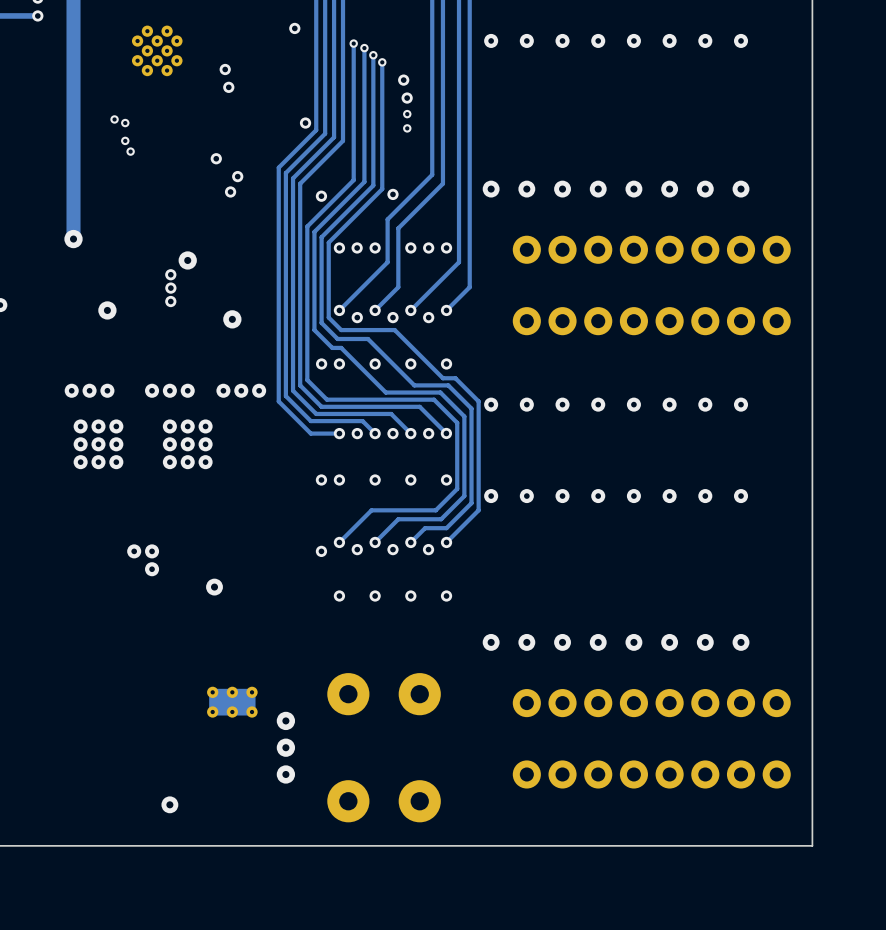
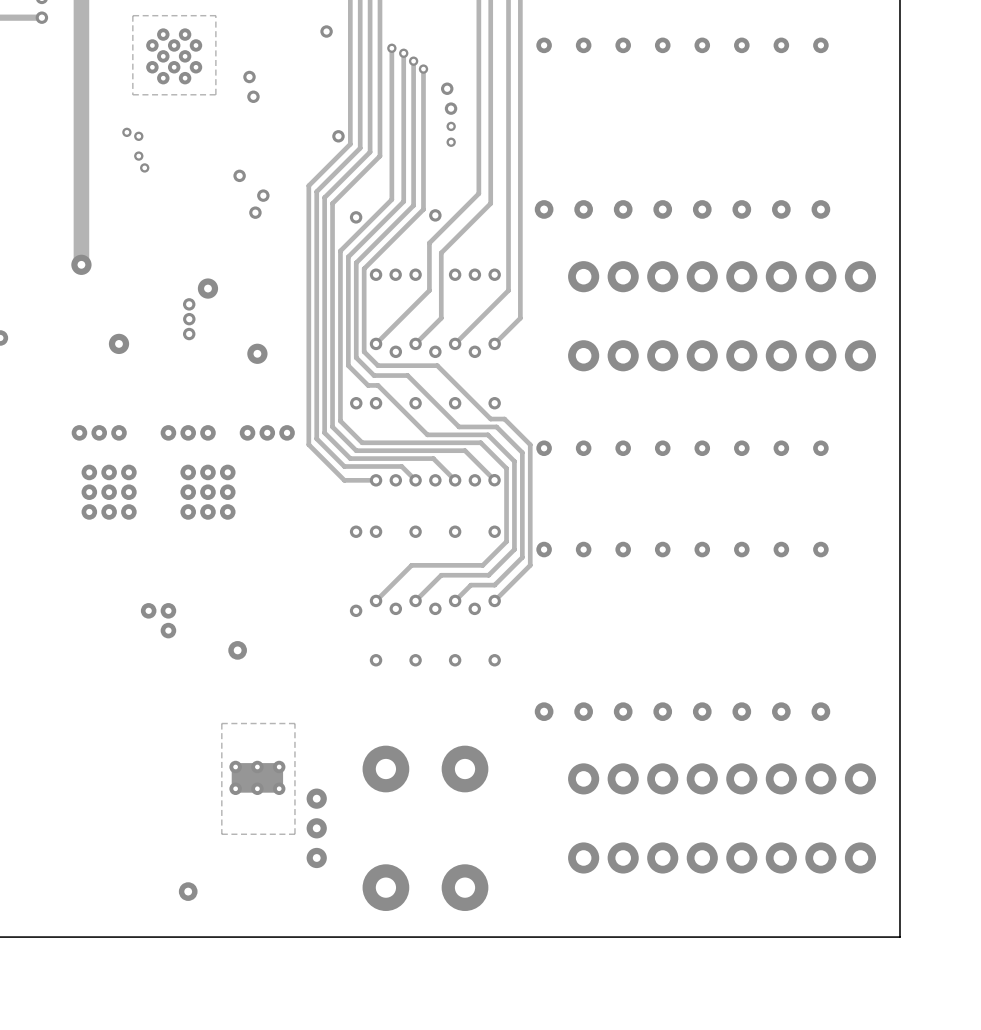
zone outline: none -> (215, 15) (132, 15) (132, 94) (215, 94) (215, 15)
zone outline: none -> (294, 723) (294, 834) (221, 834) (221, 723) (294, 723)

